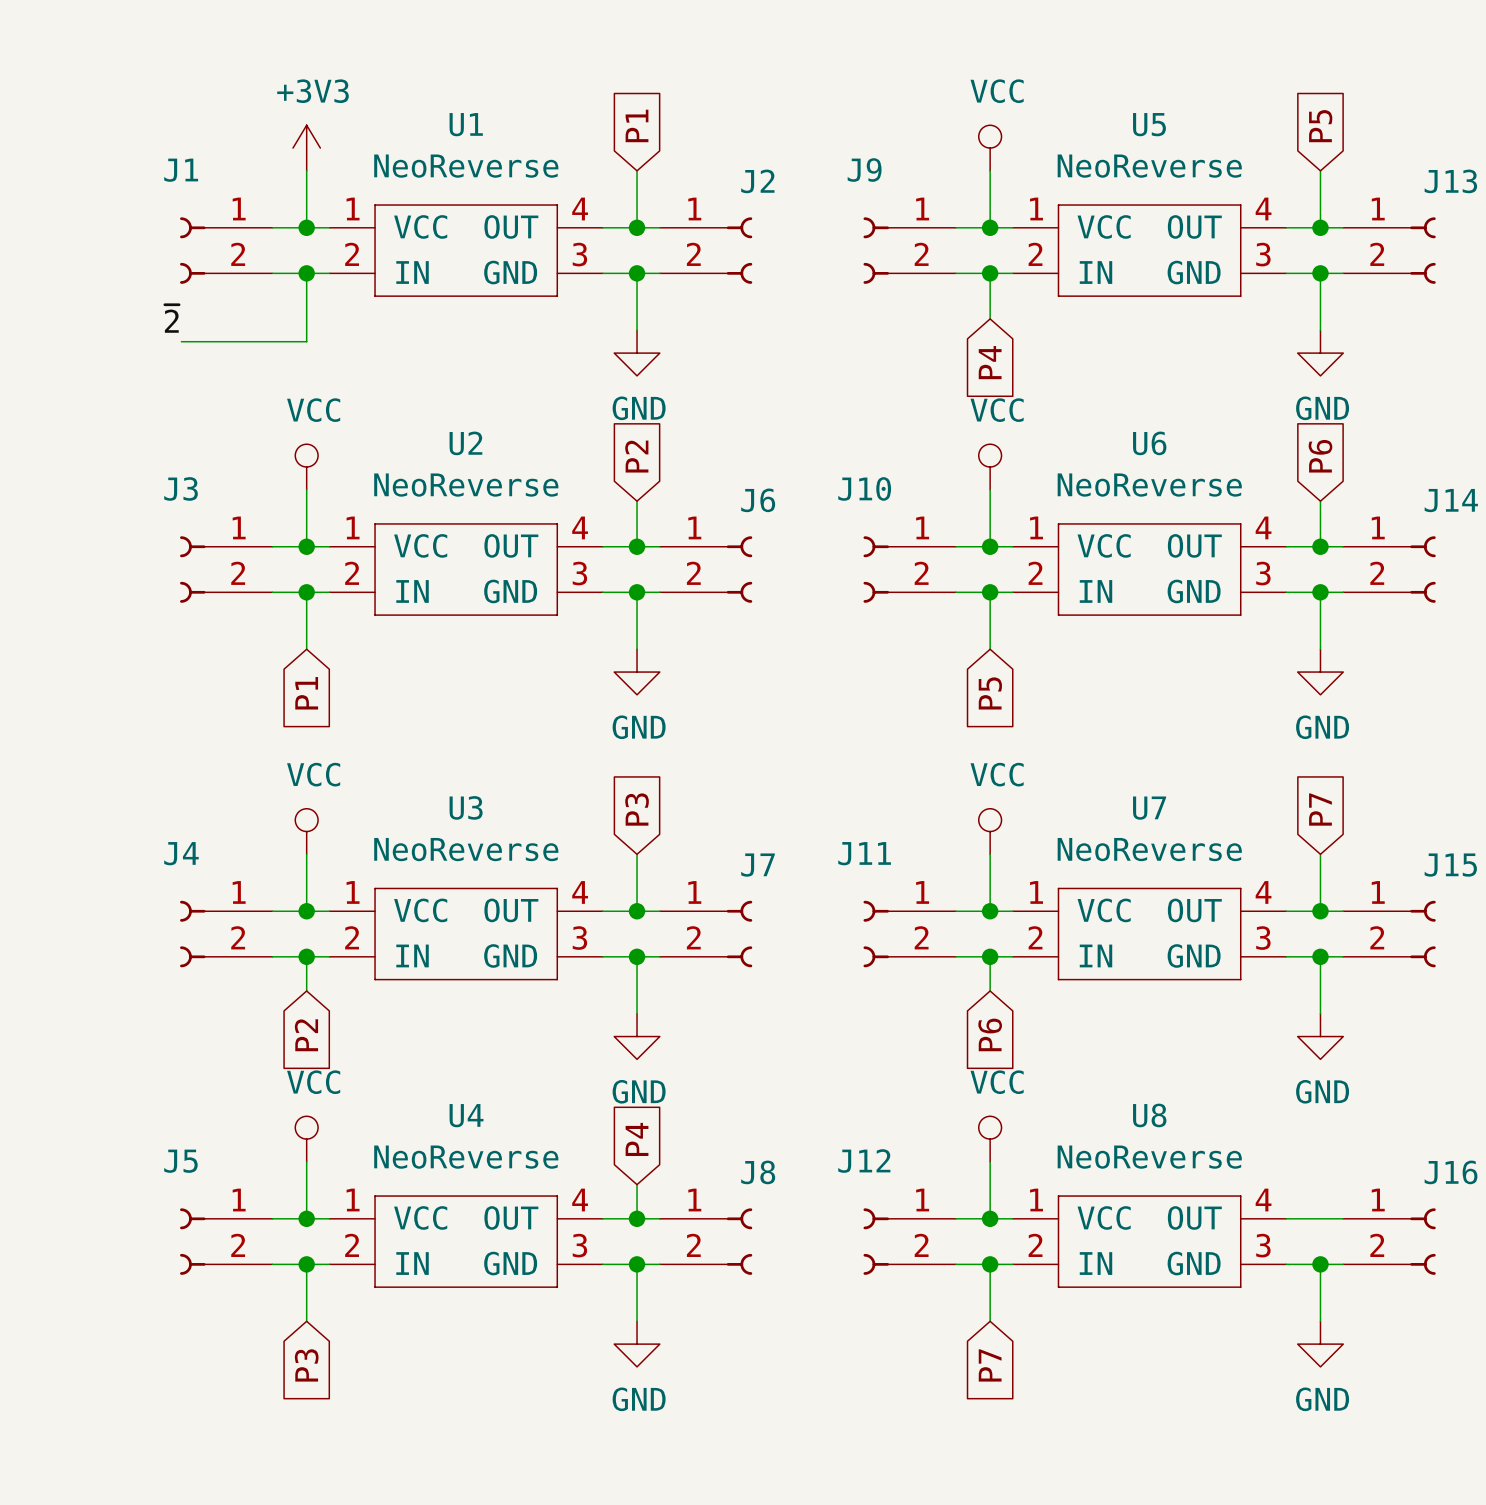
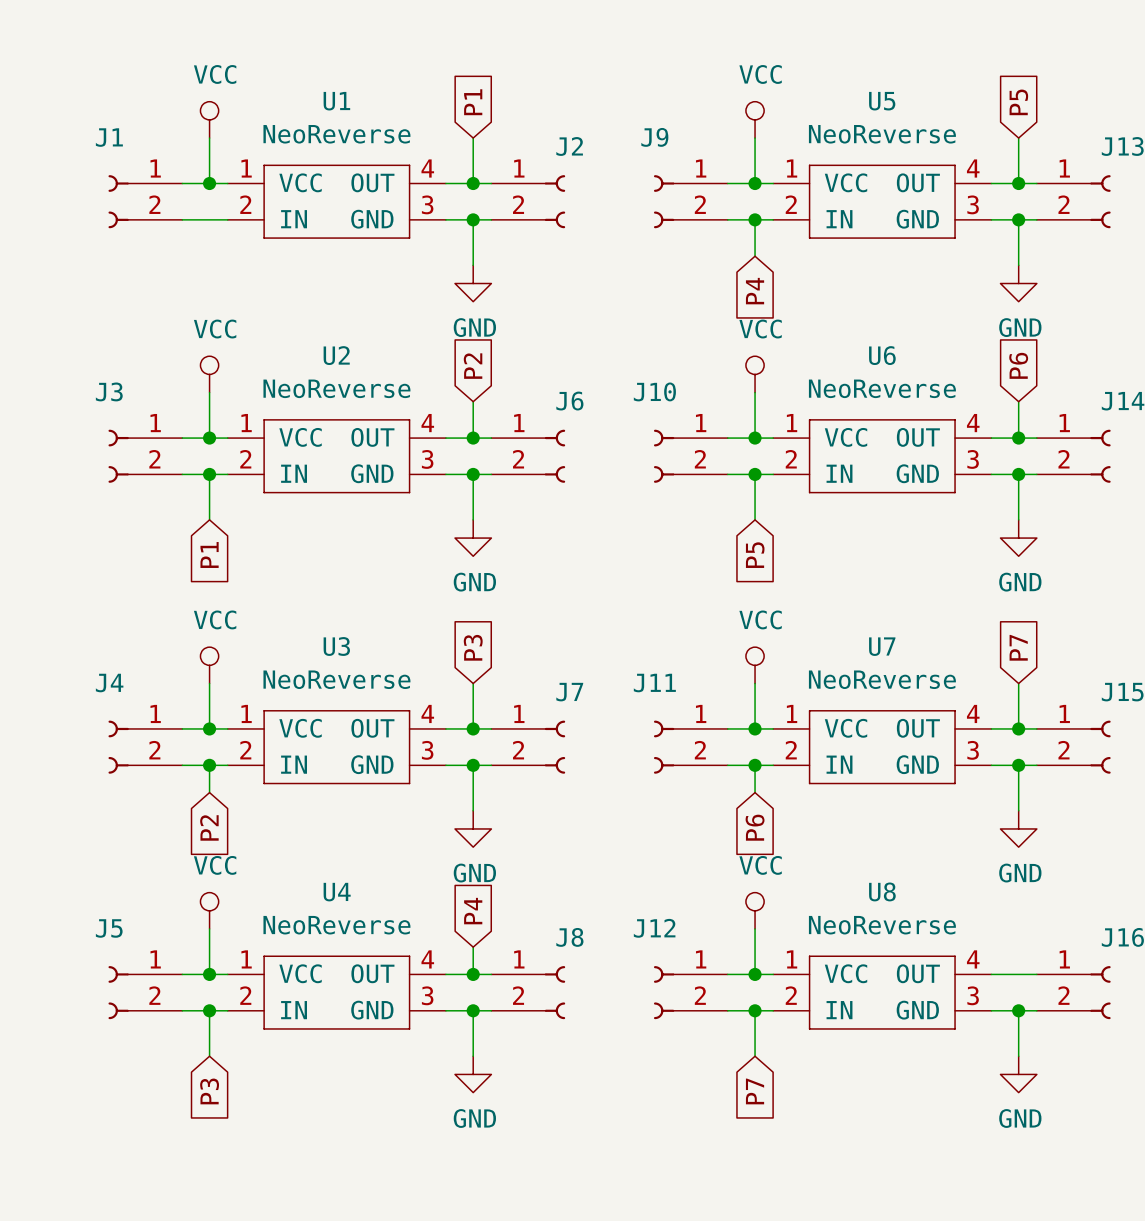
power symbol: +3V3 (306, 148) -> VCC (209, 119)
wire: (306, 273) (306, 341) (181, 341) -> none
junction: (306, 273) -> none
label: ~{2} (171, 318) -> none

